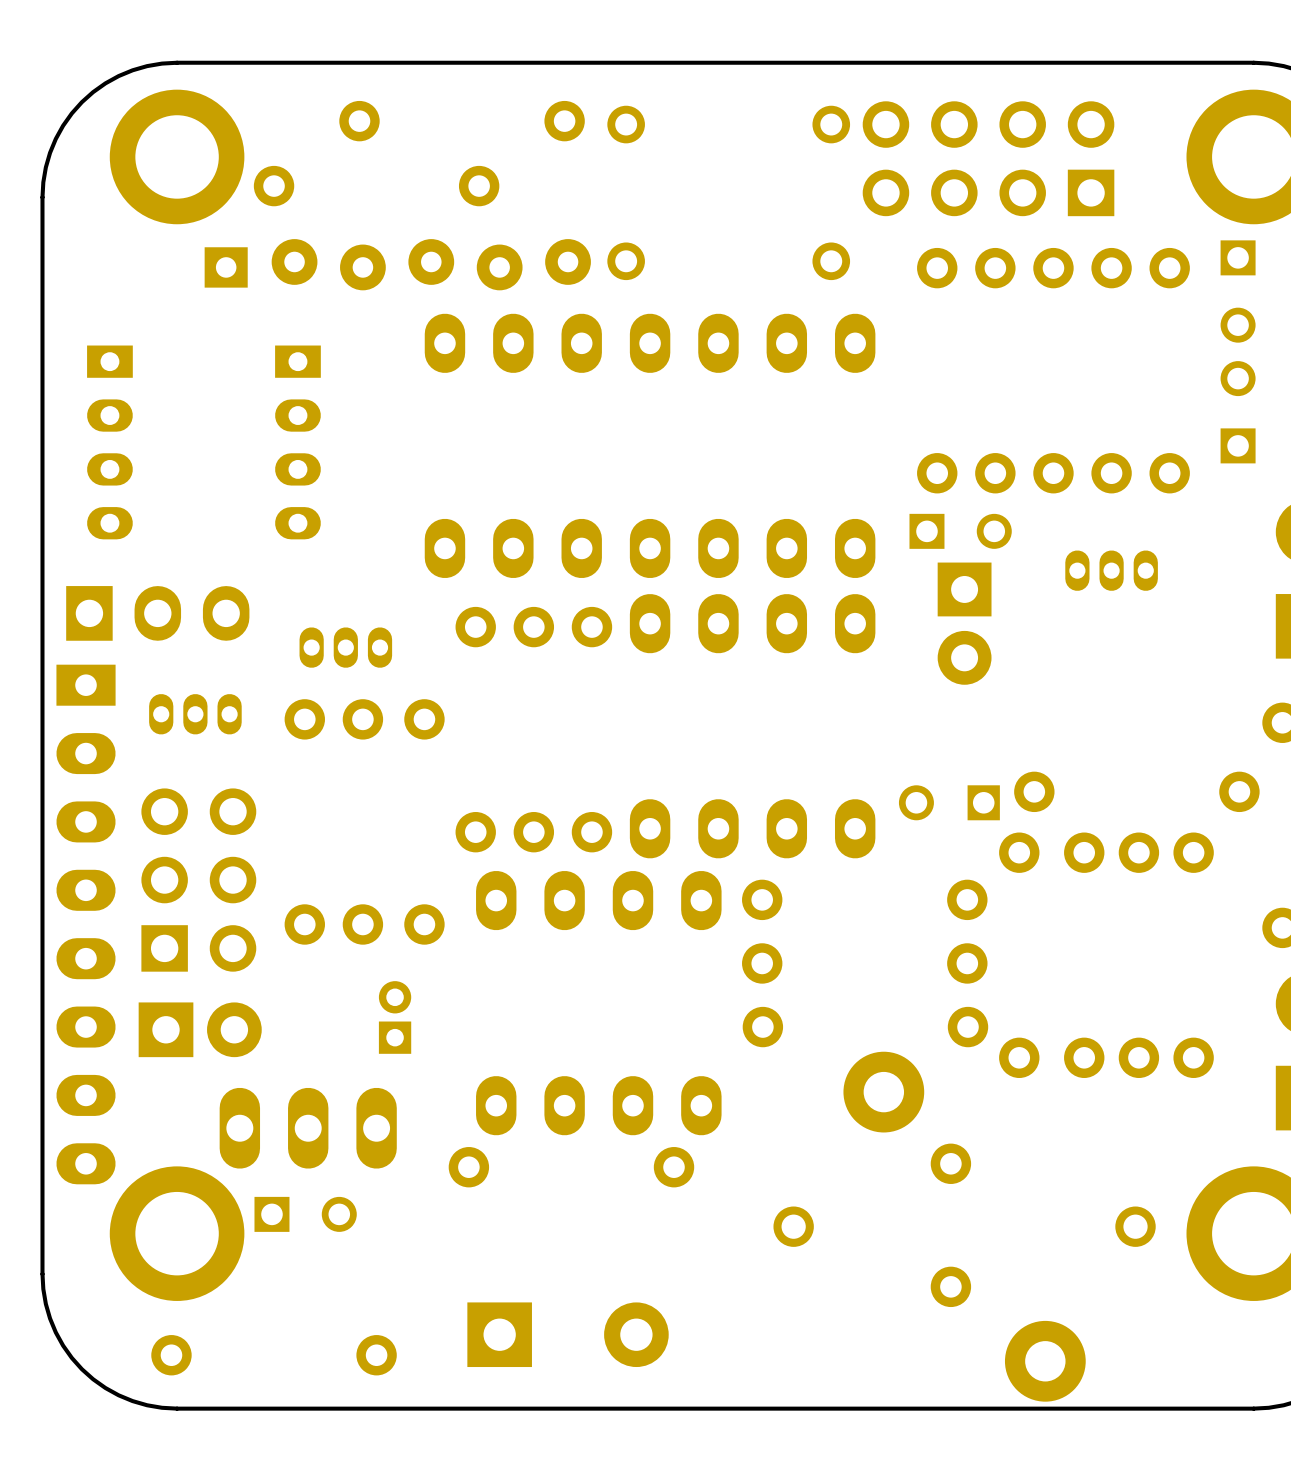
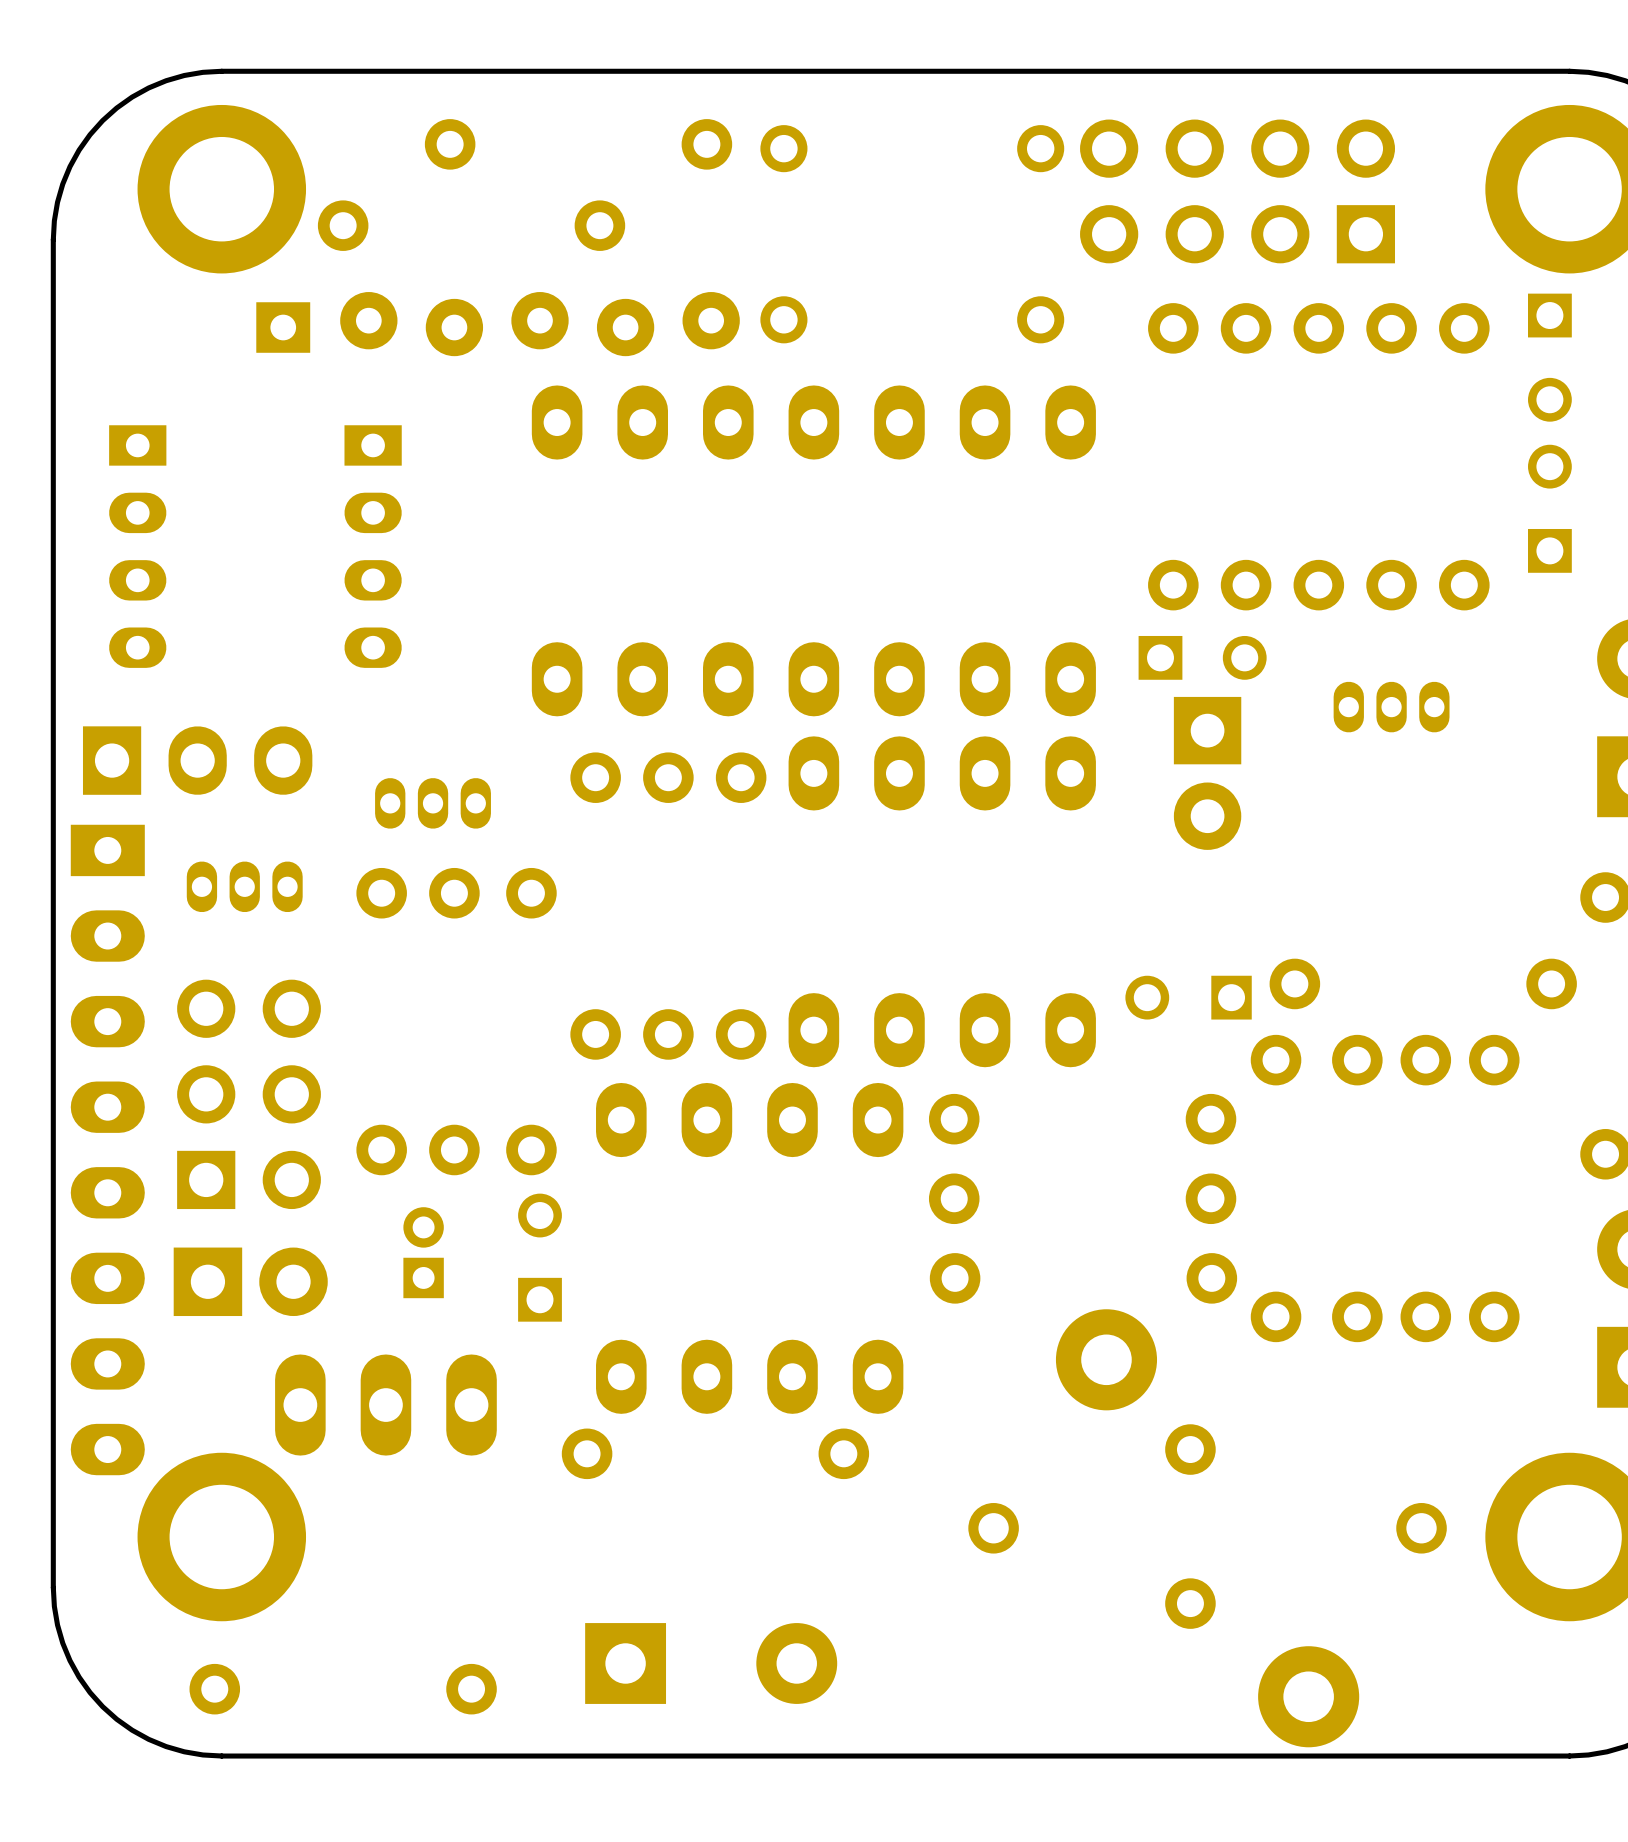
part position: (395, 1017) -> (423, 1252)
part rotation: 0° (305, 1214) -> 90° counterclockwise (540, 1257)
part position: (305, 1214) -> (540, 1257)

